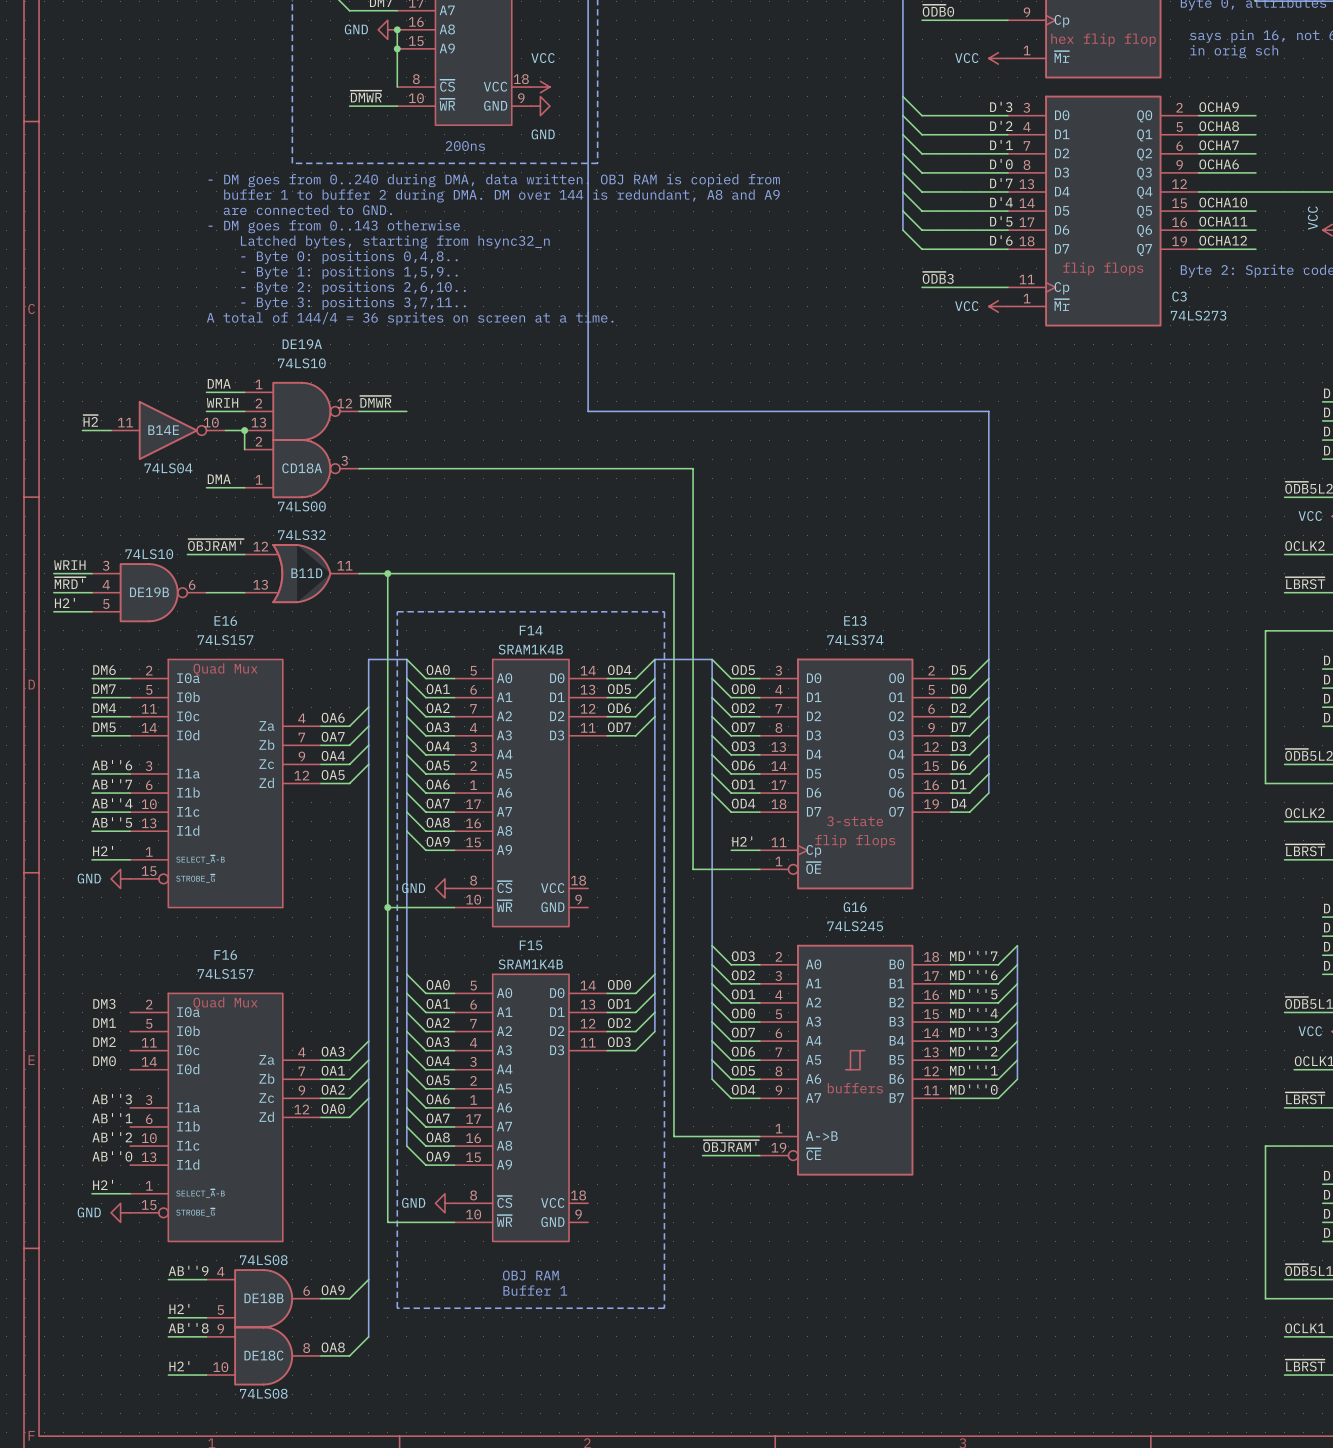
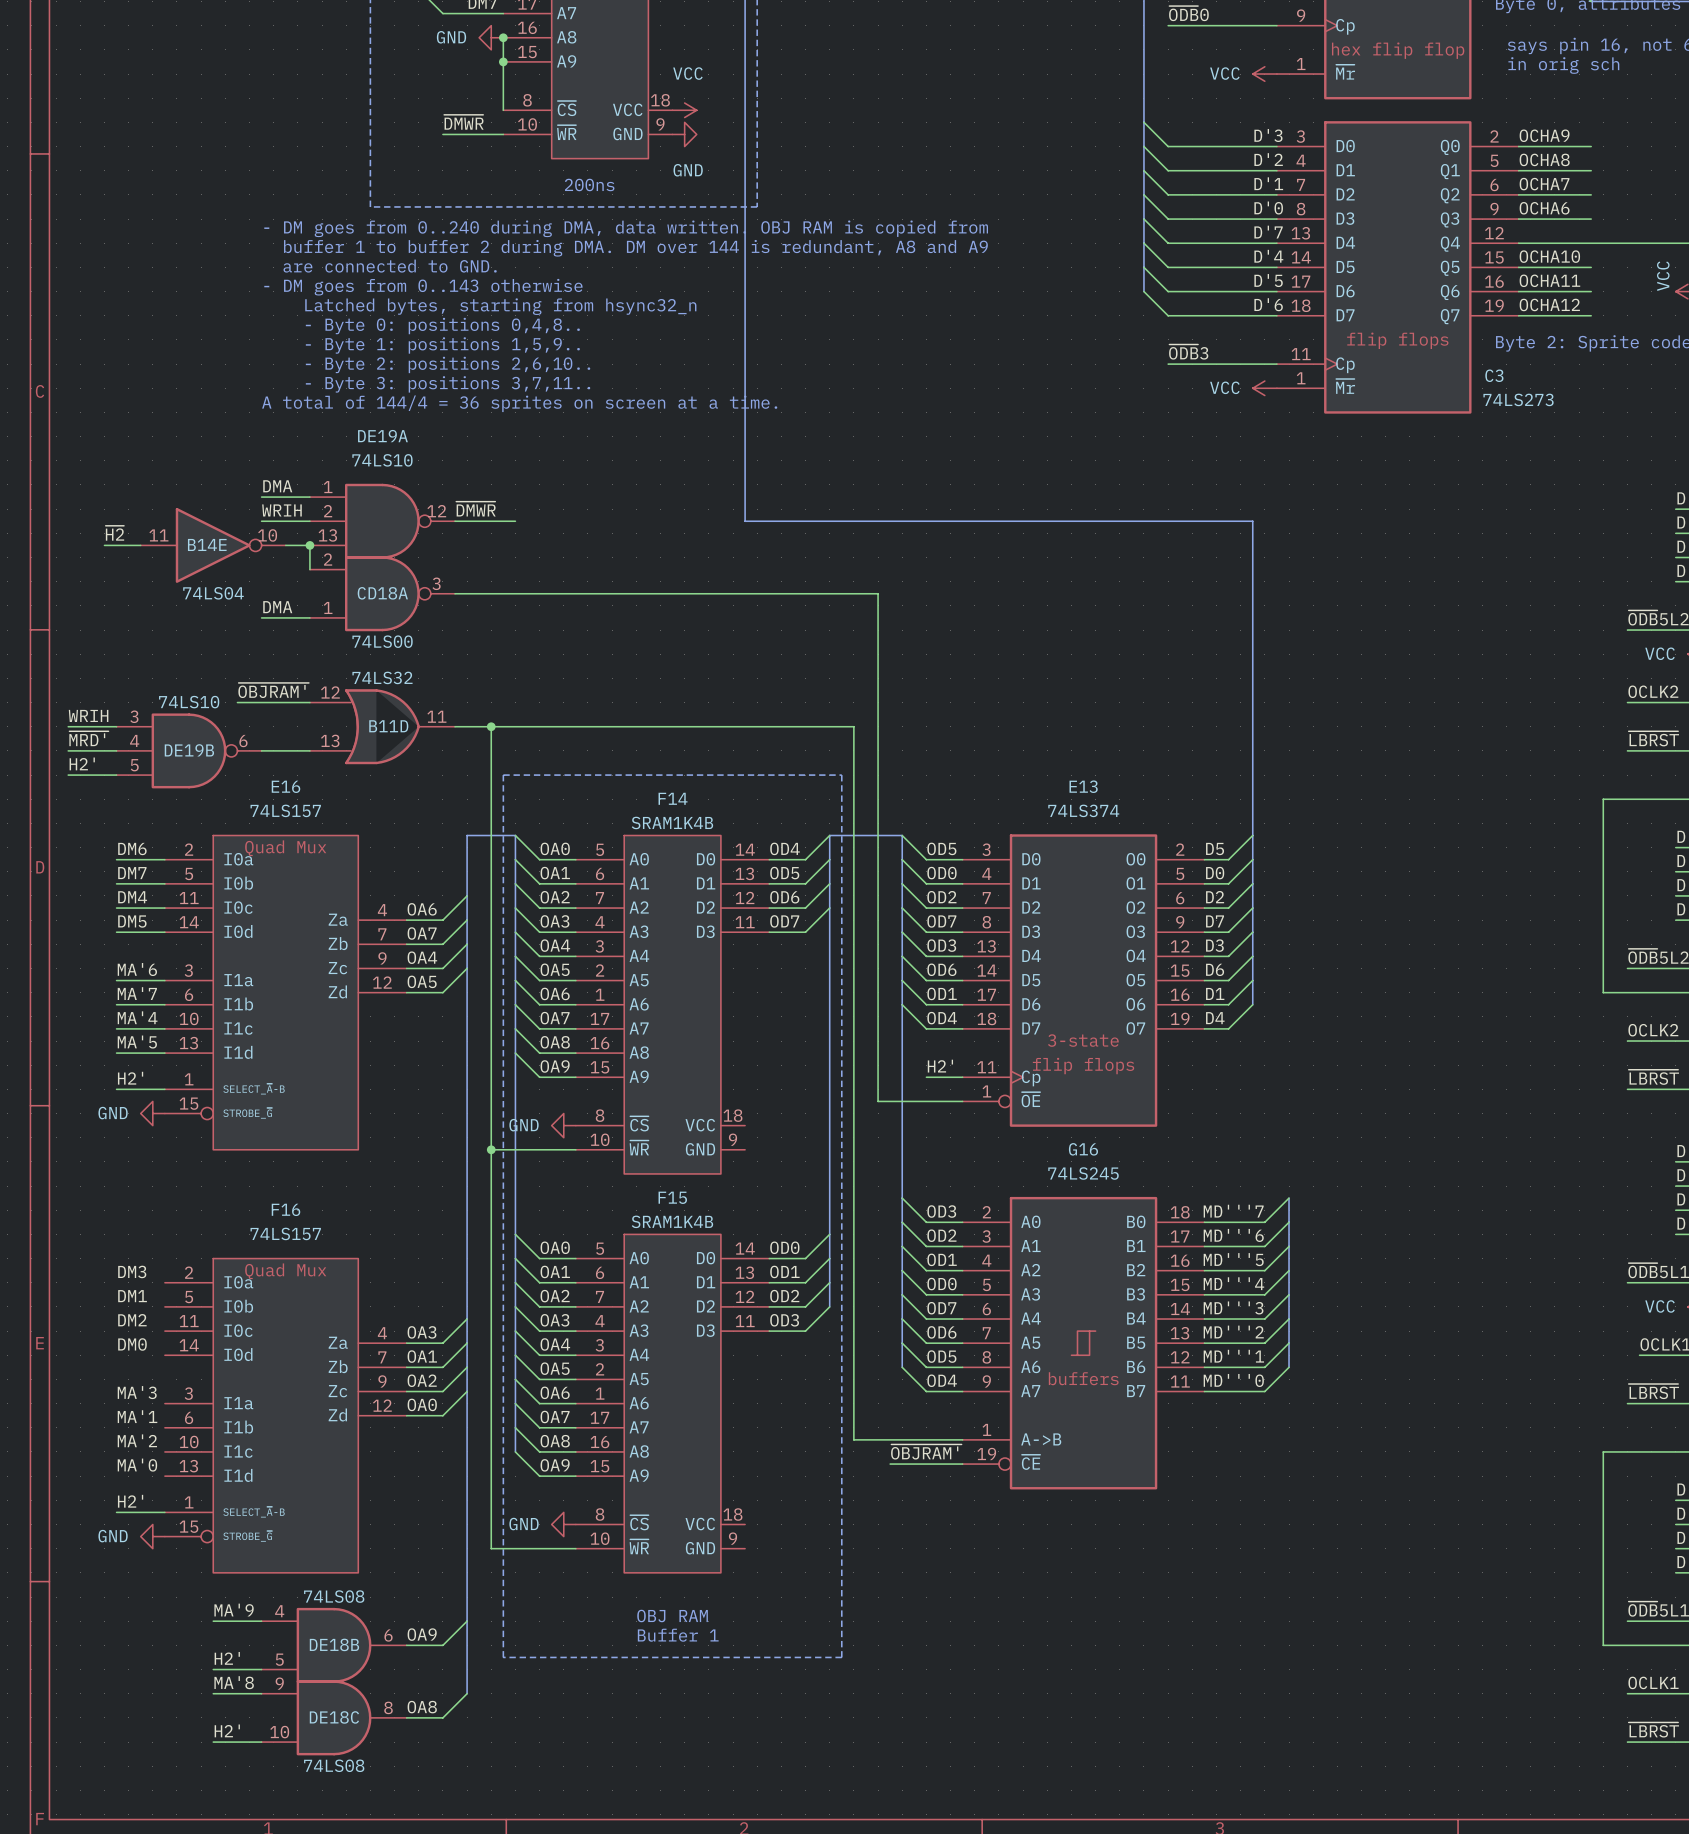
label: AB''6 (112, 765) -> MA'6 (137, 969)
label: AB''7 (112, 784) -> MA'7 (137, 993)
label: AB''4 (112, 803) -> MA'4 (137, 1017)
label: AB''5 (112, 822) -> MA'5 (137, 1042)
label: AB''3 (112, 1099) -> MA'3 (137, 1392)
label: AB''1 (112, 1118) -> MA'1 (137, 1416)
label: AB''2 (112, 1137) -> MA'2 (137, 1440)
label: AB''0 (112, 1156) -> MA'0 (137, 1465)
label: AB''9 (188, 1270) -> MA'9 (234, 1610)
label: AB''8 (188, 1328) -> MA'8 (234, 1682)

